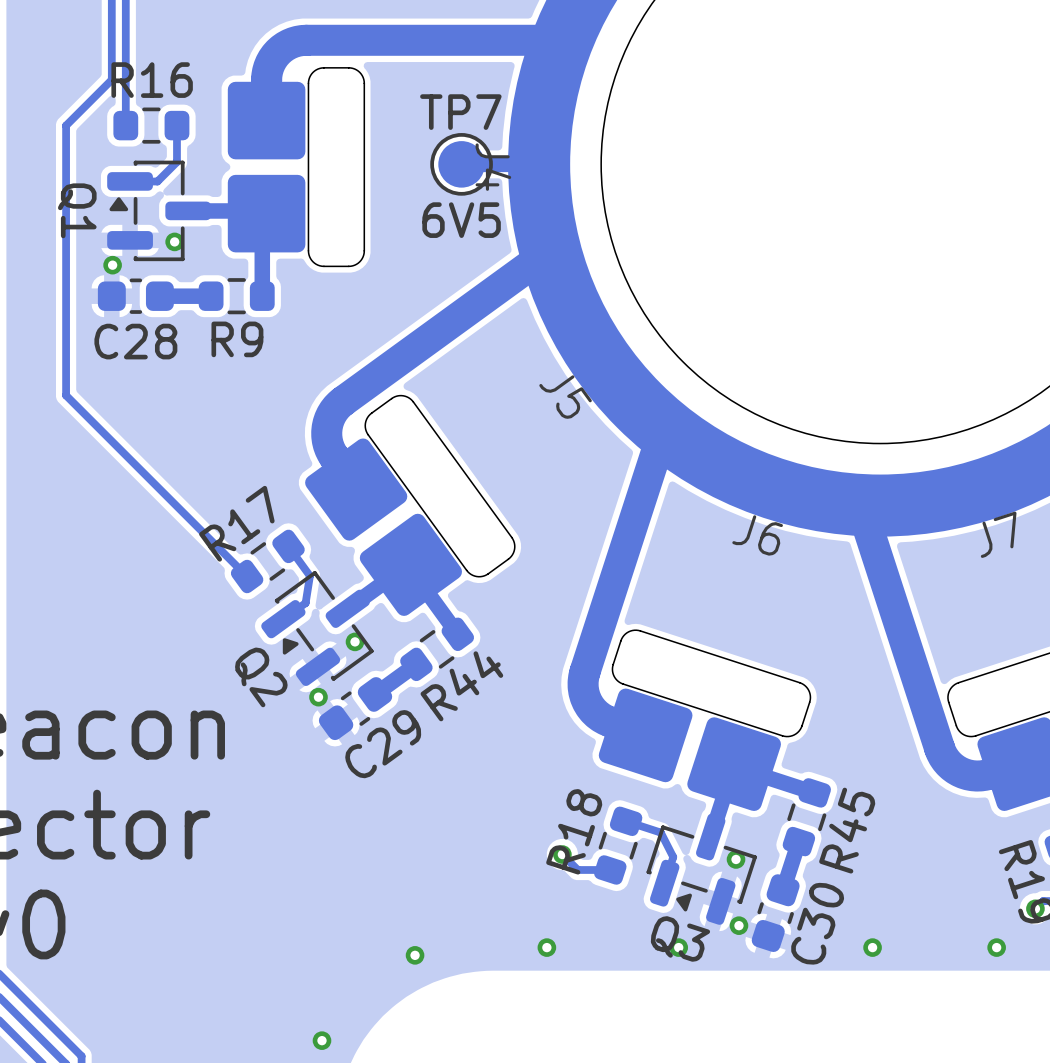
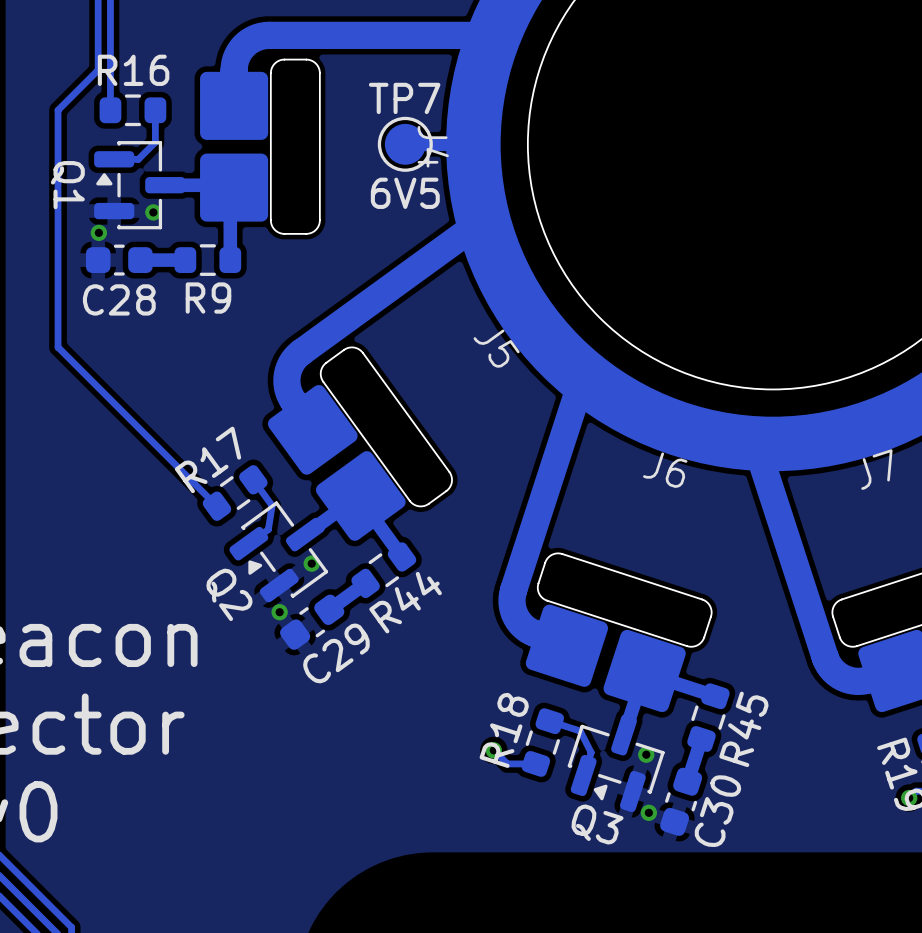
via: (546, 947) -> none
via: (678, 947) -> none
via: (872, 947) -> none
via: (996, 947) -> none
via: (415, 955) -> none
via: (321, 1040) -> none

